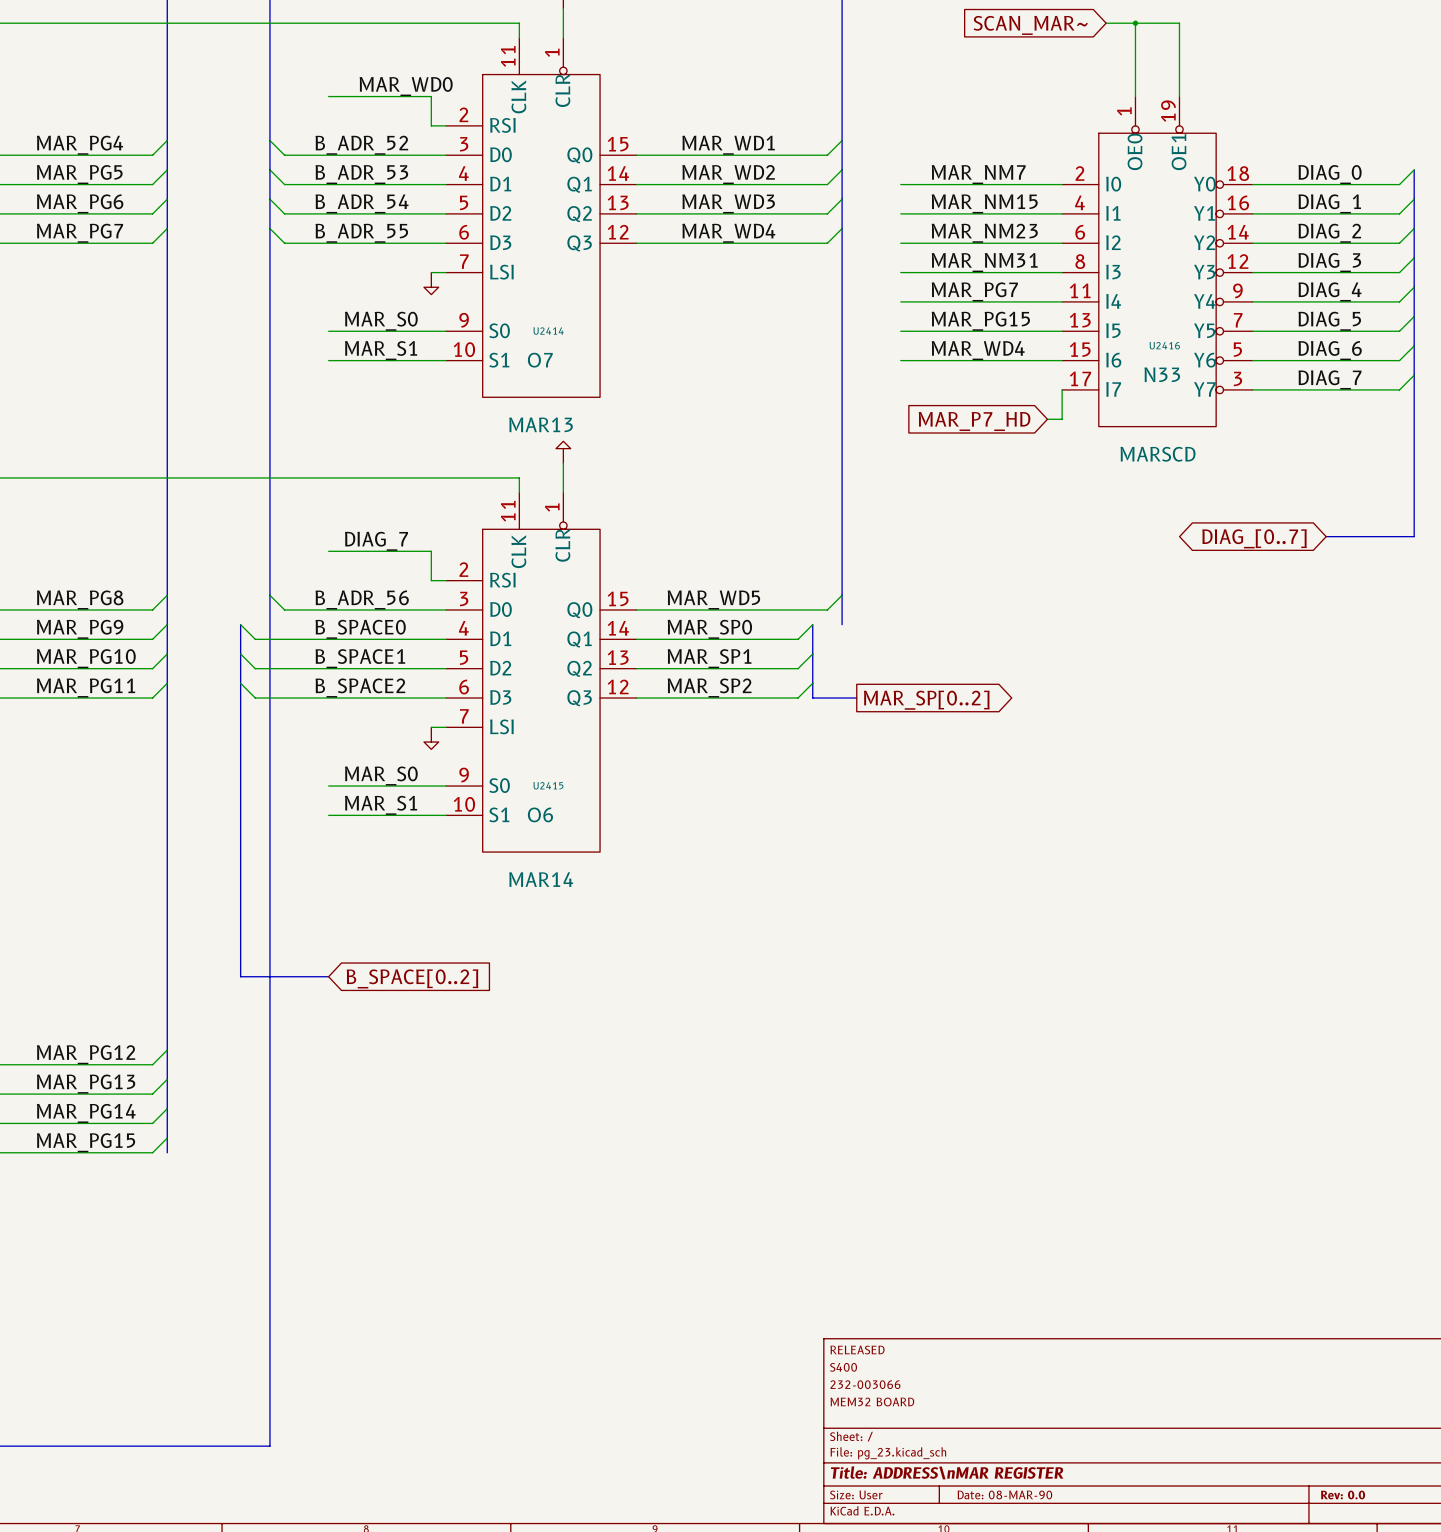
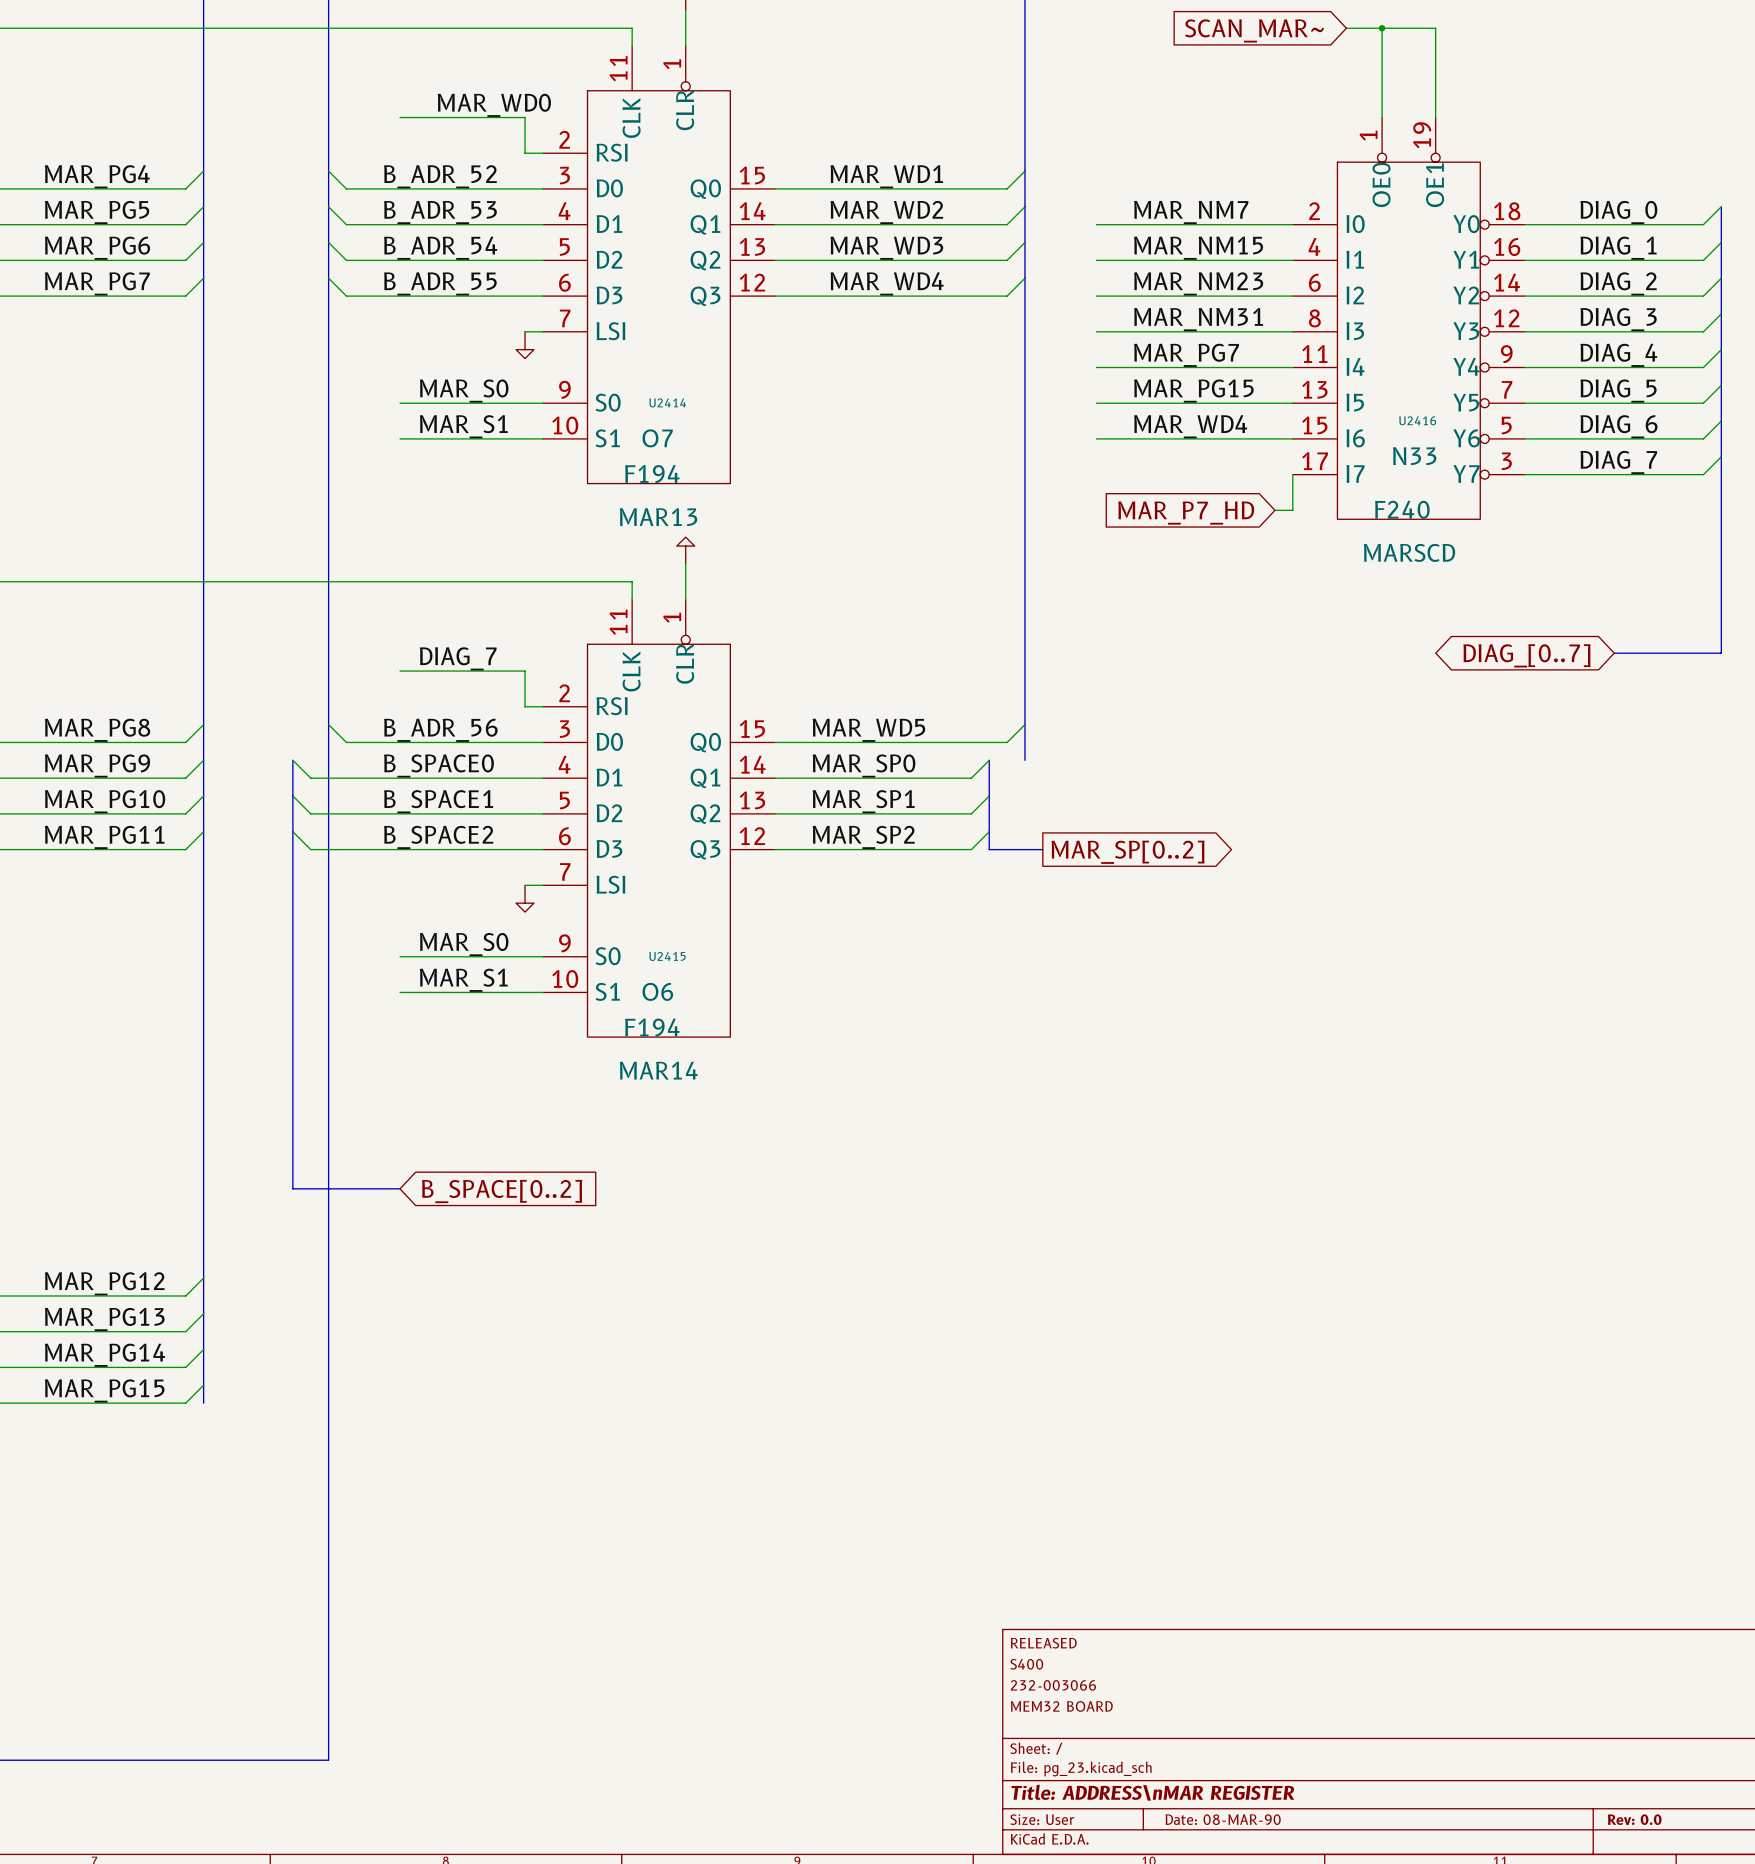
U2414 value: none -> F194 (652, 474)
U2416 value: none -> F240 (1402, 509)
U2415 value: none -> F194 (652, 1027)

